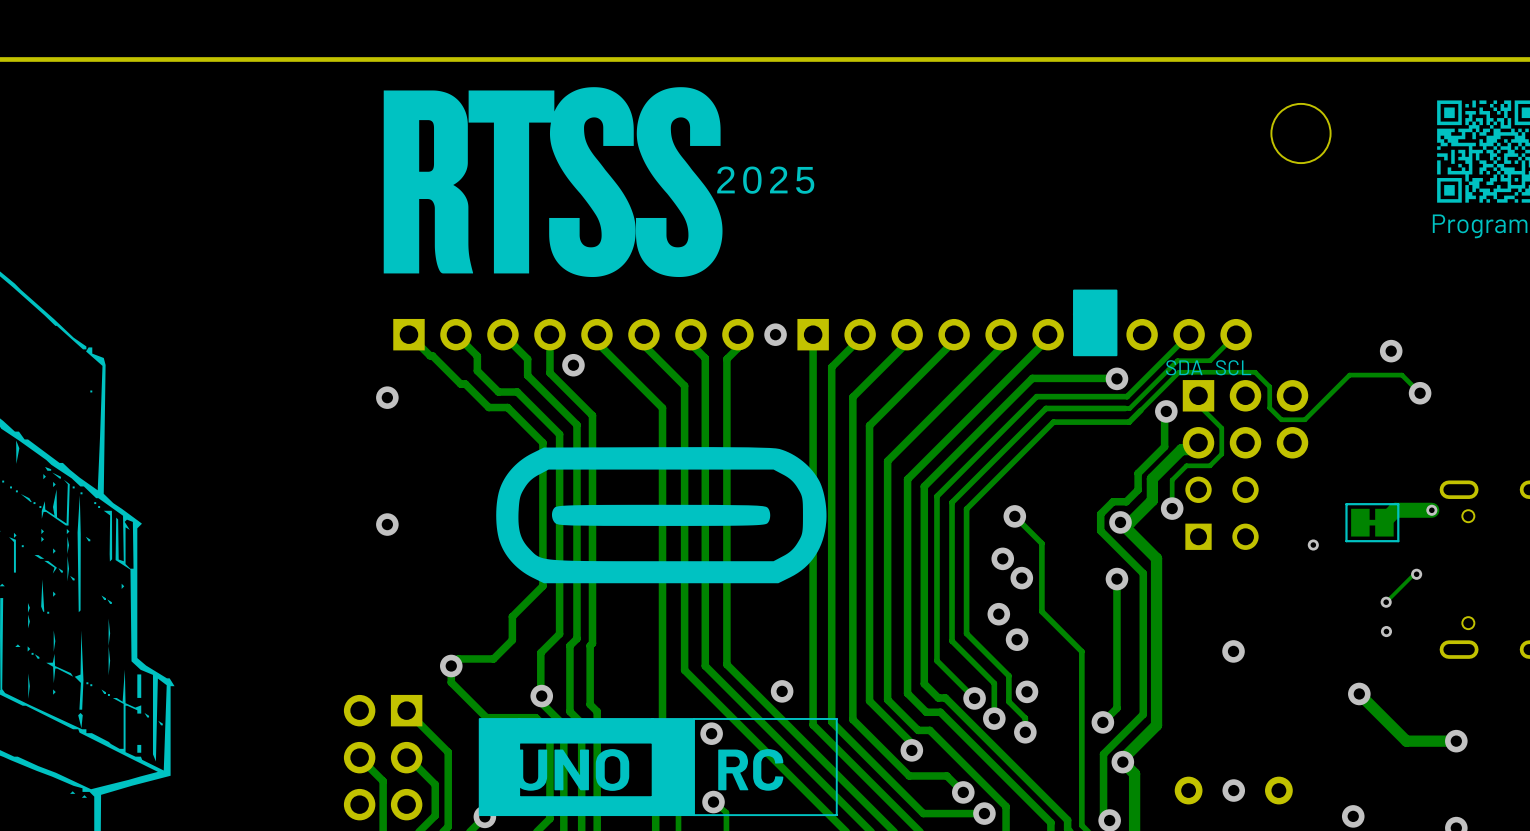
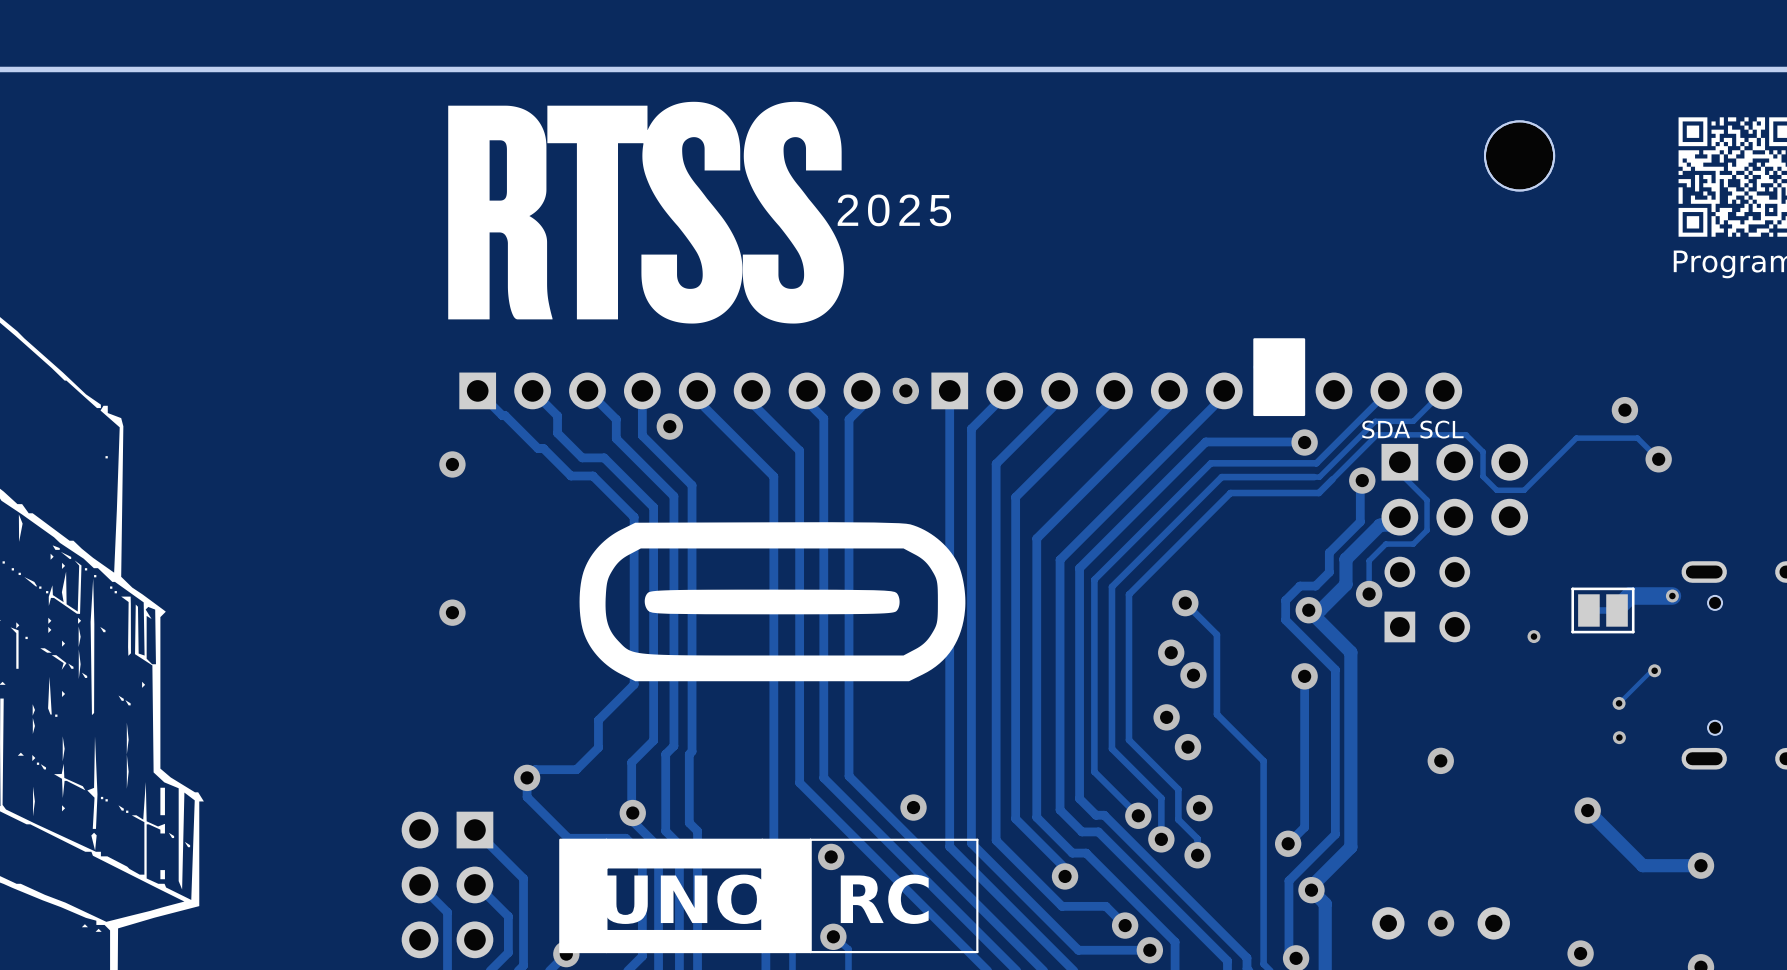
part: none -> (1519, 155)

